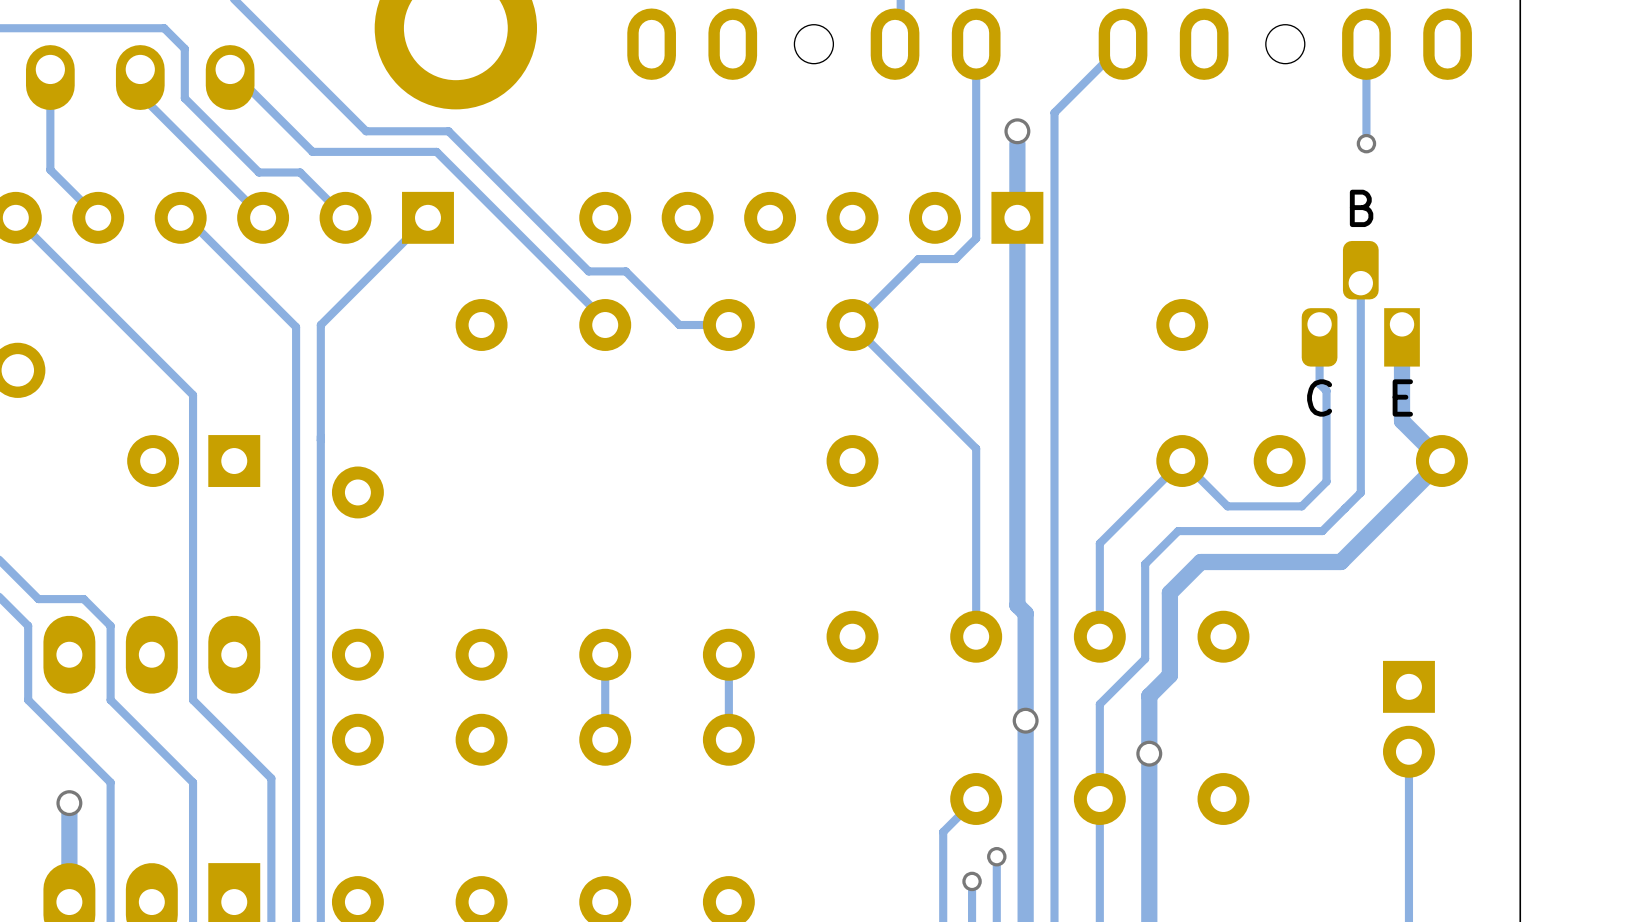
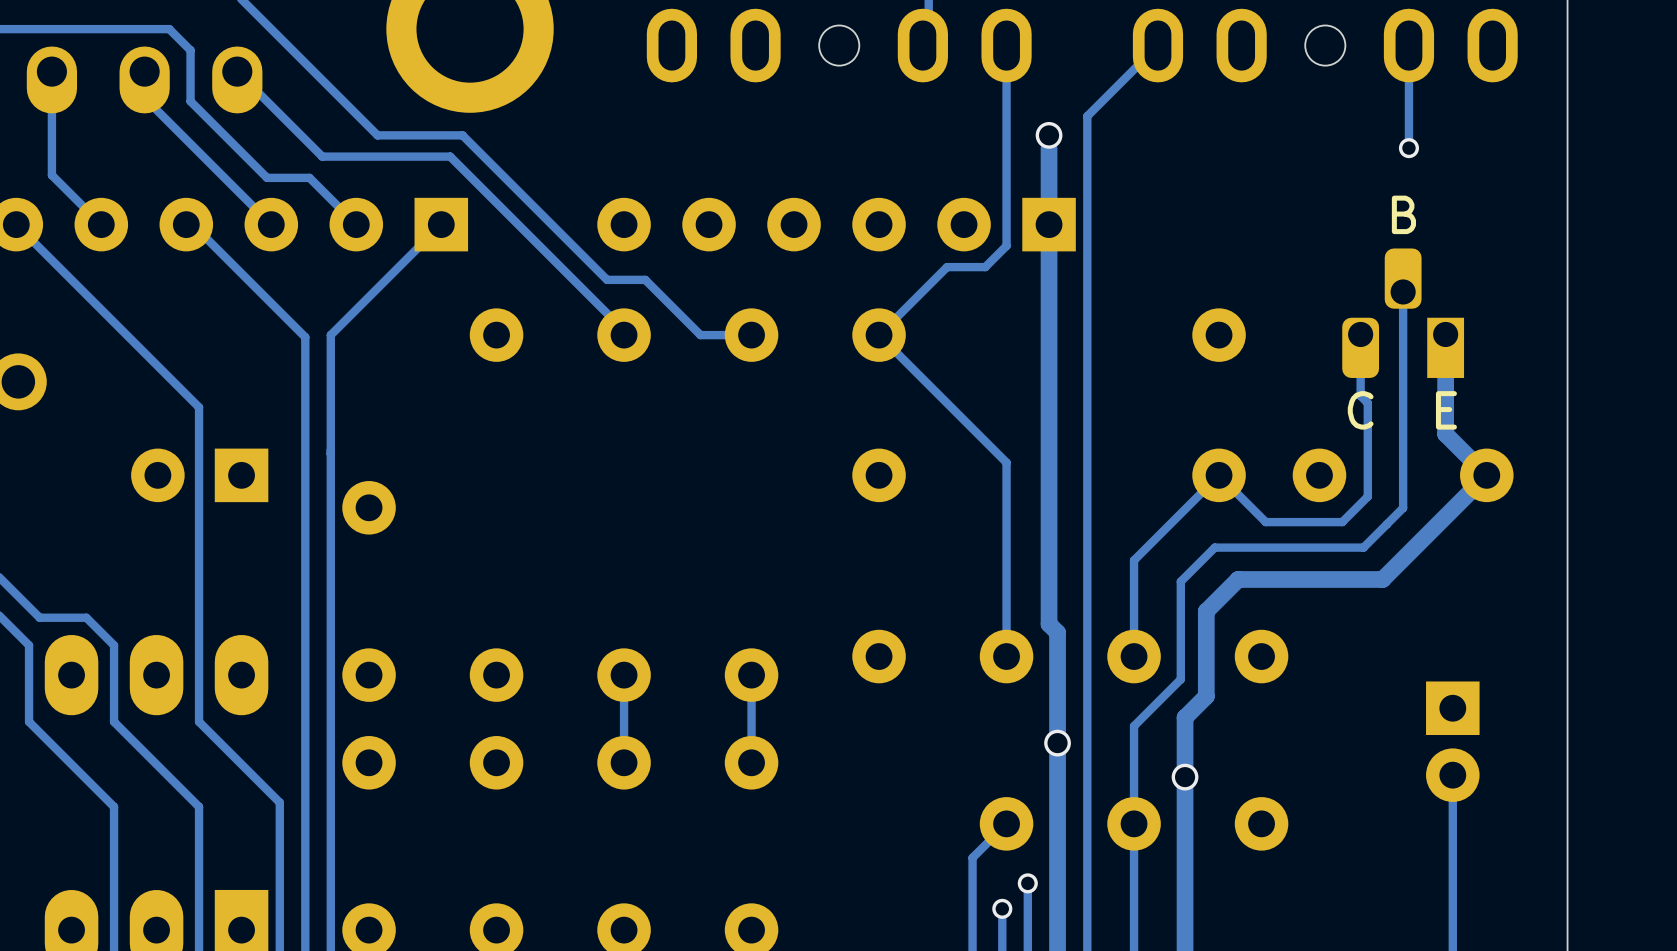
track: (69, 803) (69, 902) -> none
via: (69, 803) -> none

